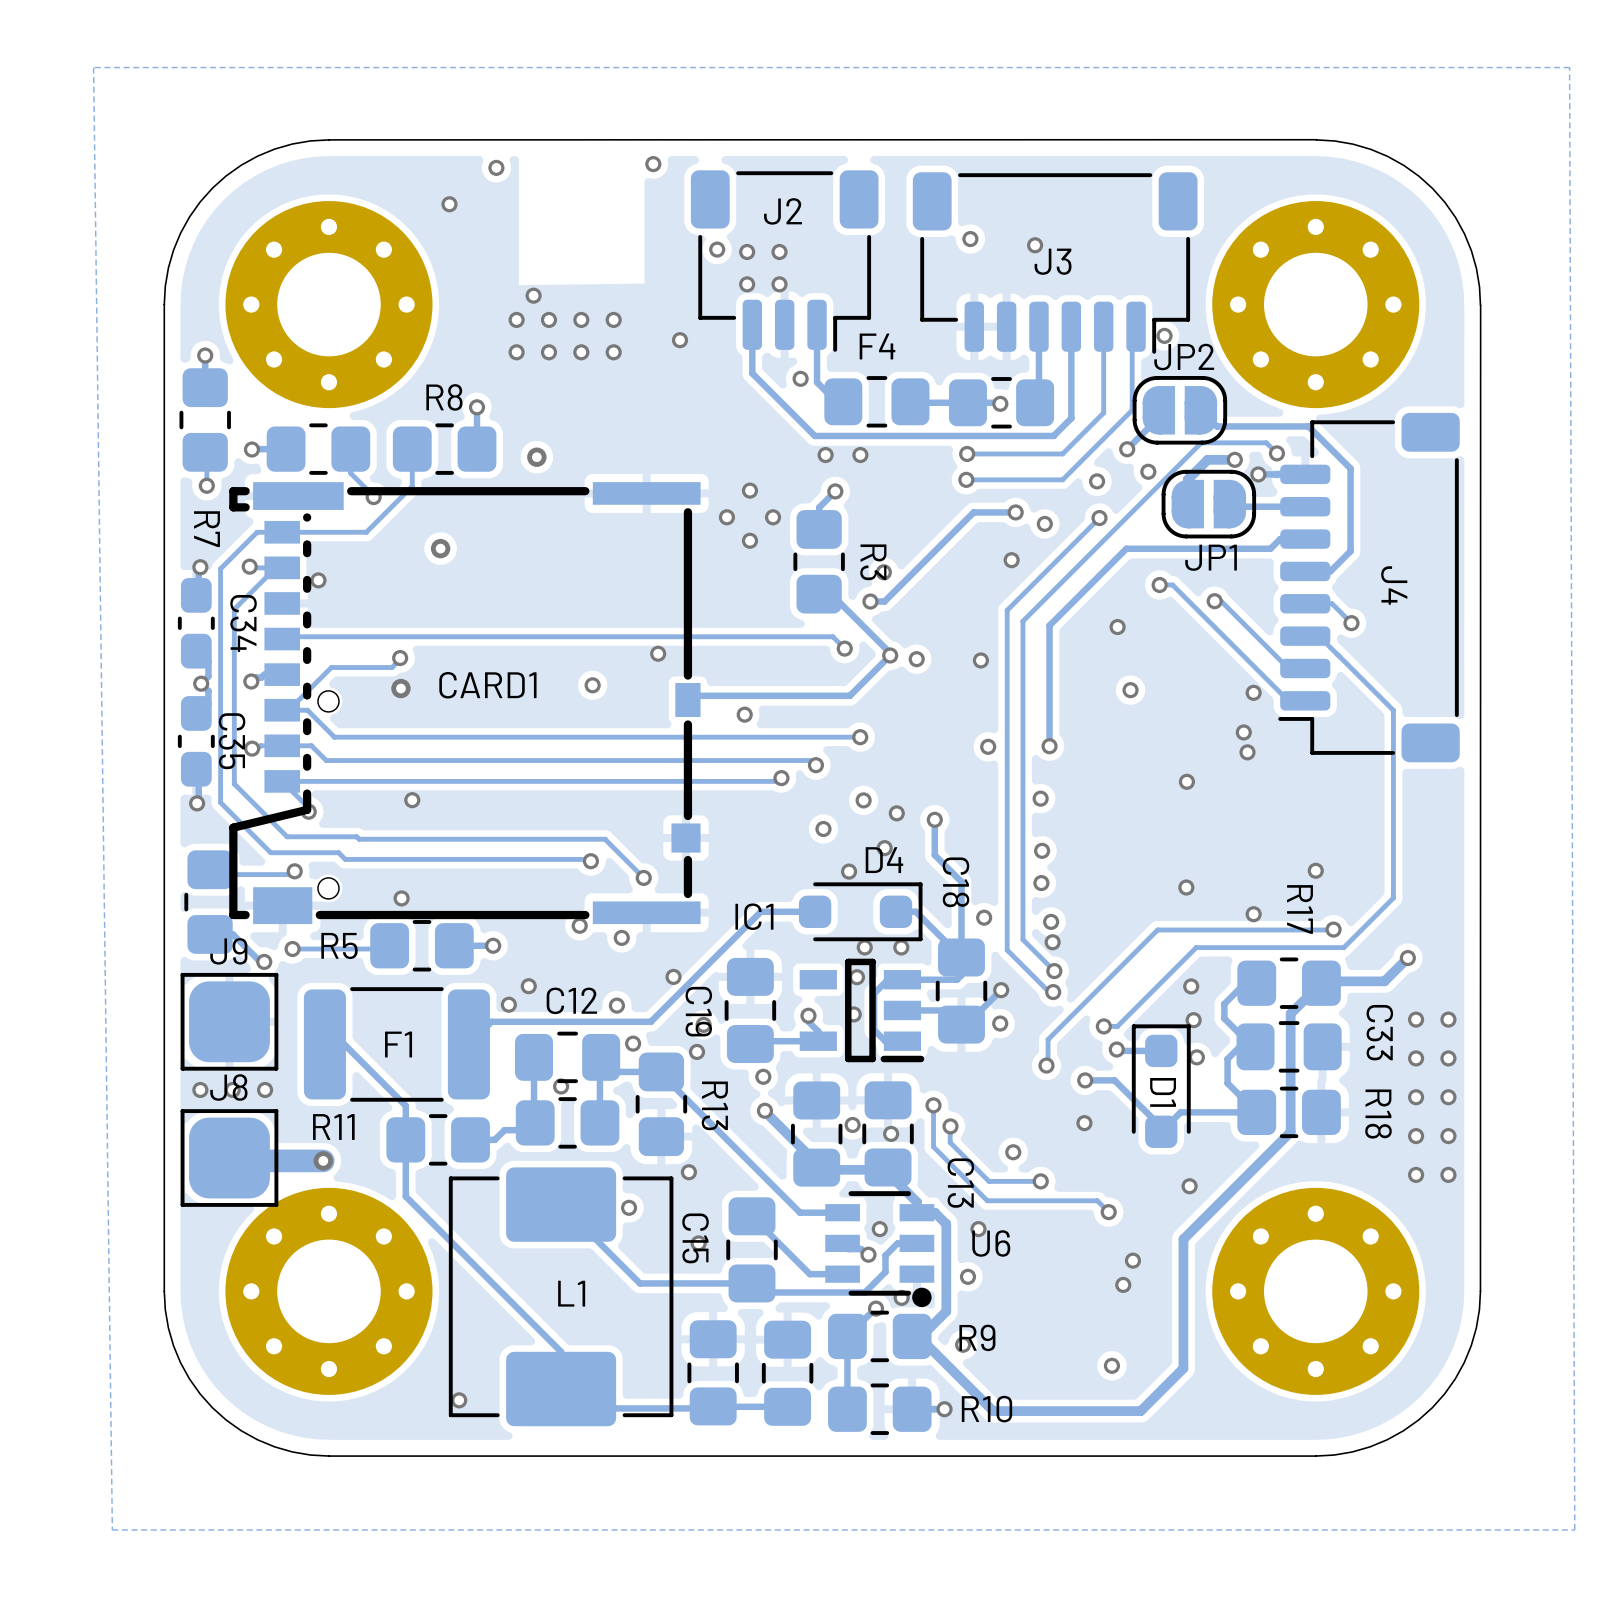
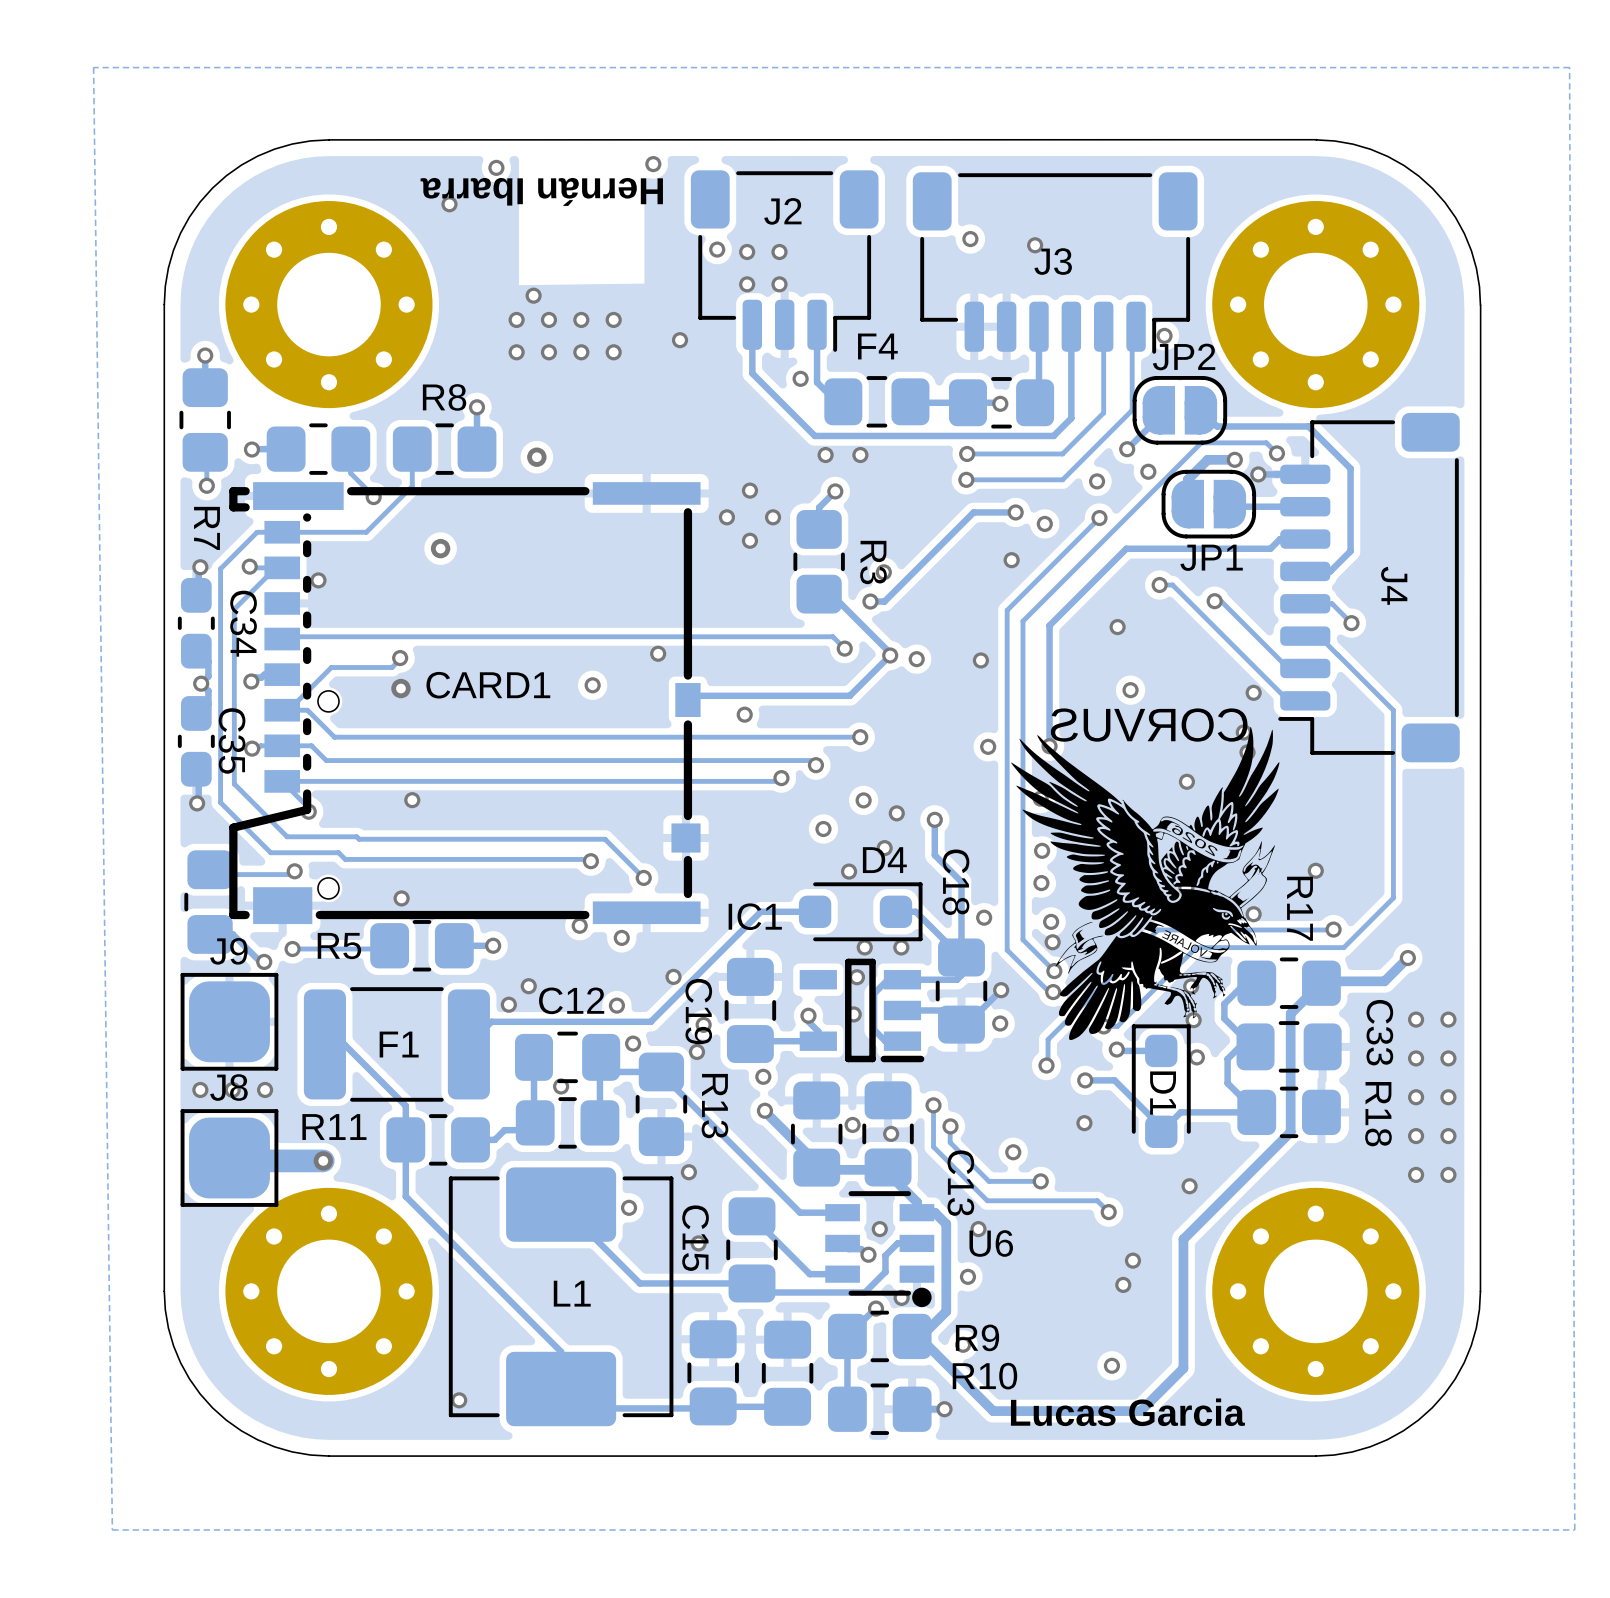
text: none -> Hernán Ibarra (541, 191)
drawing: none -> [1011, 726, 1280, 1040]
R10 name position: R10 (987, 1409) -> R10 (984, 1376)
text: none -> Lucas Garcia (1127, 1412)

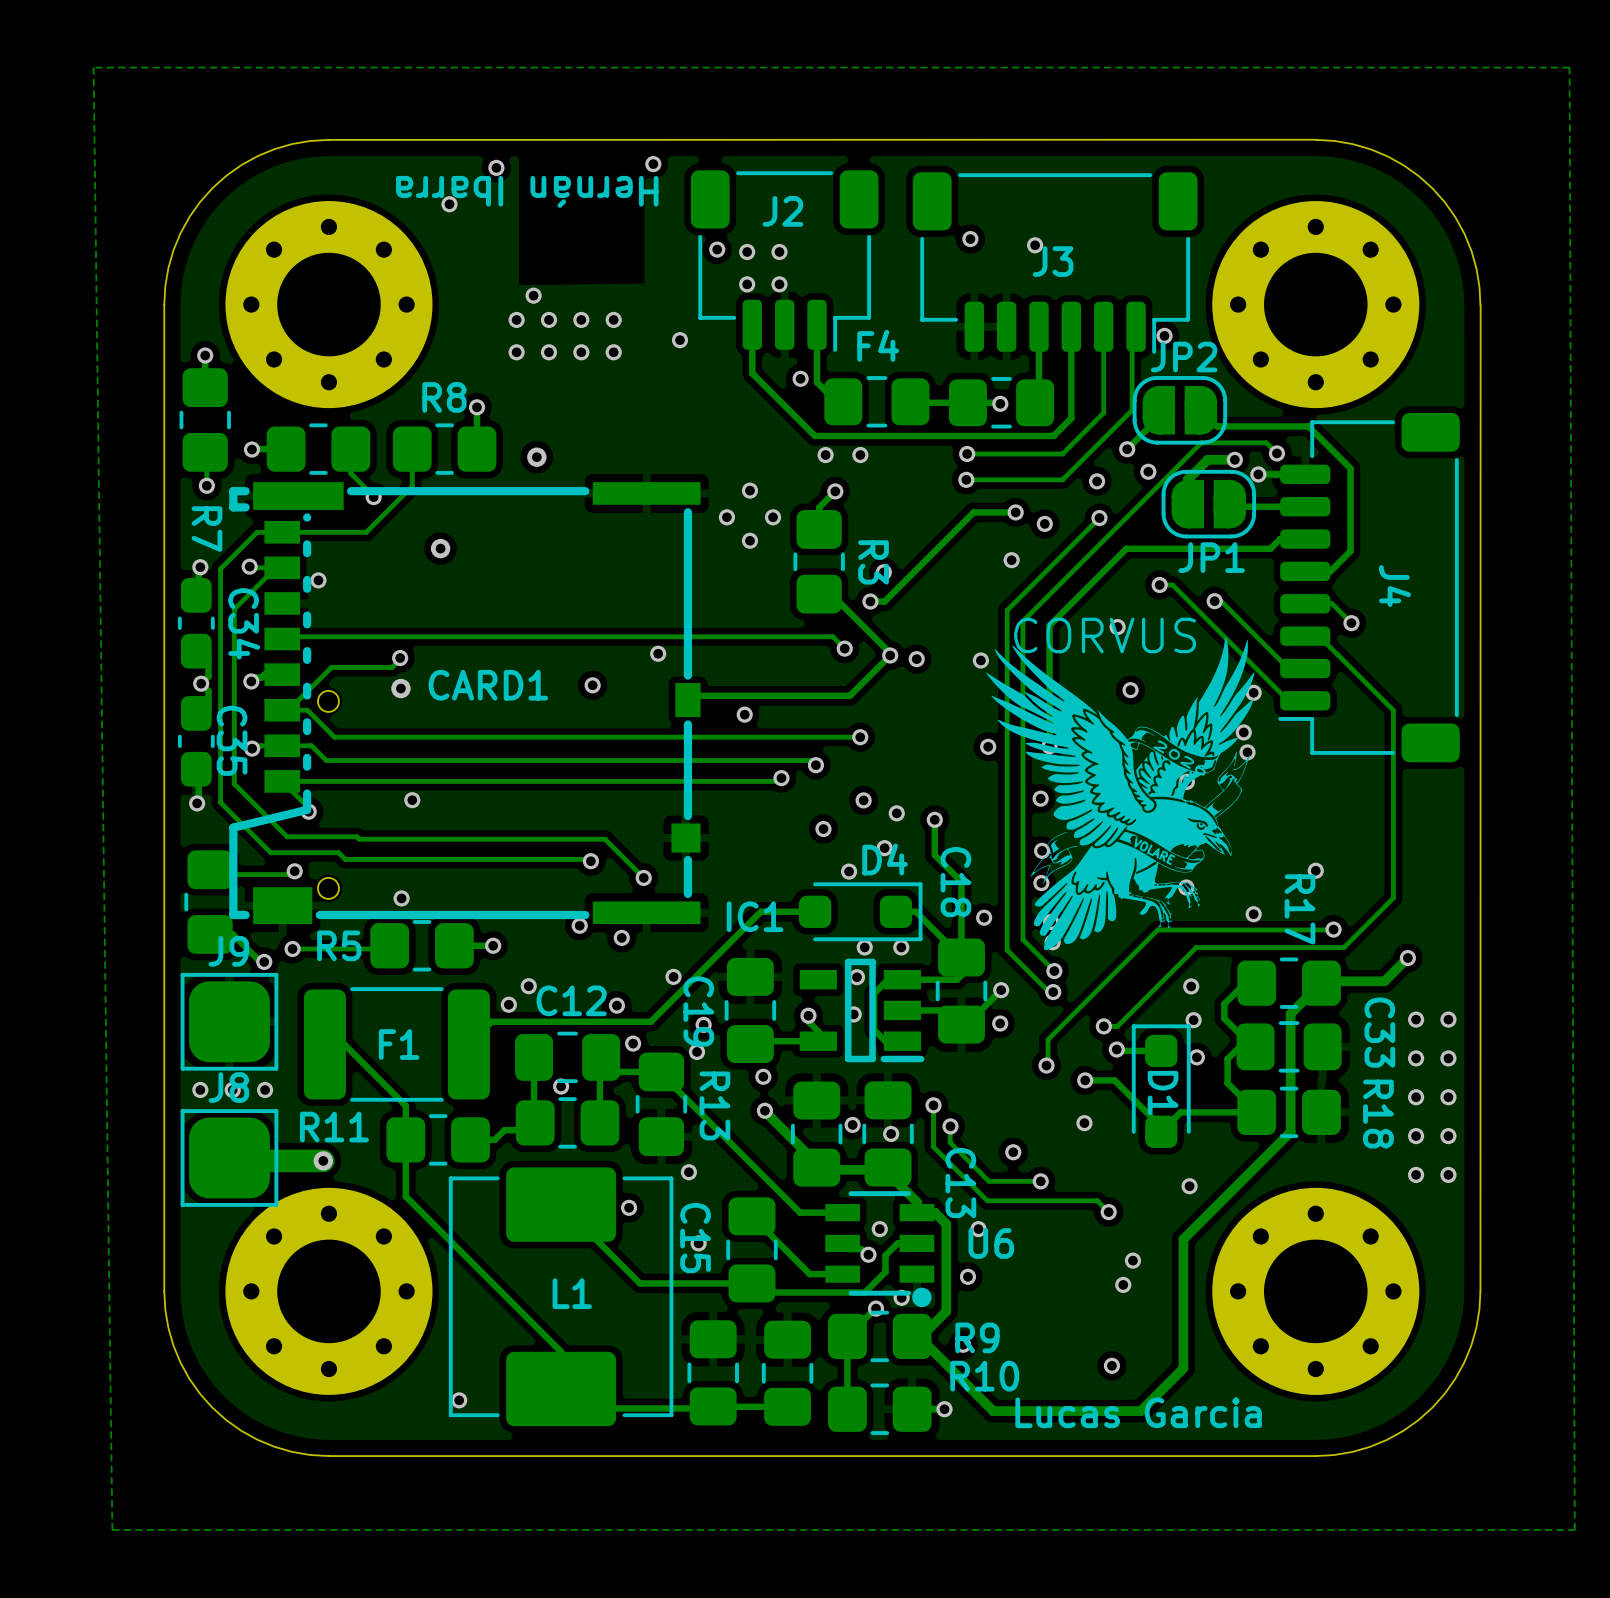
drawing: none -> [986, 636, 1255, 951]
drawing: [1011, 726, 1280, 1040] -> none

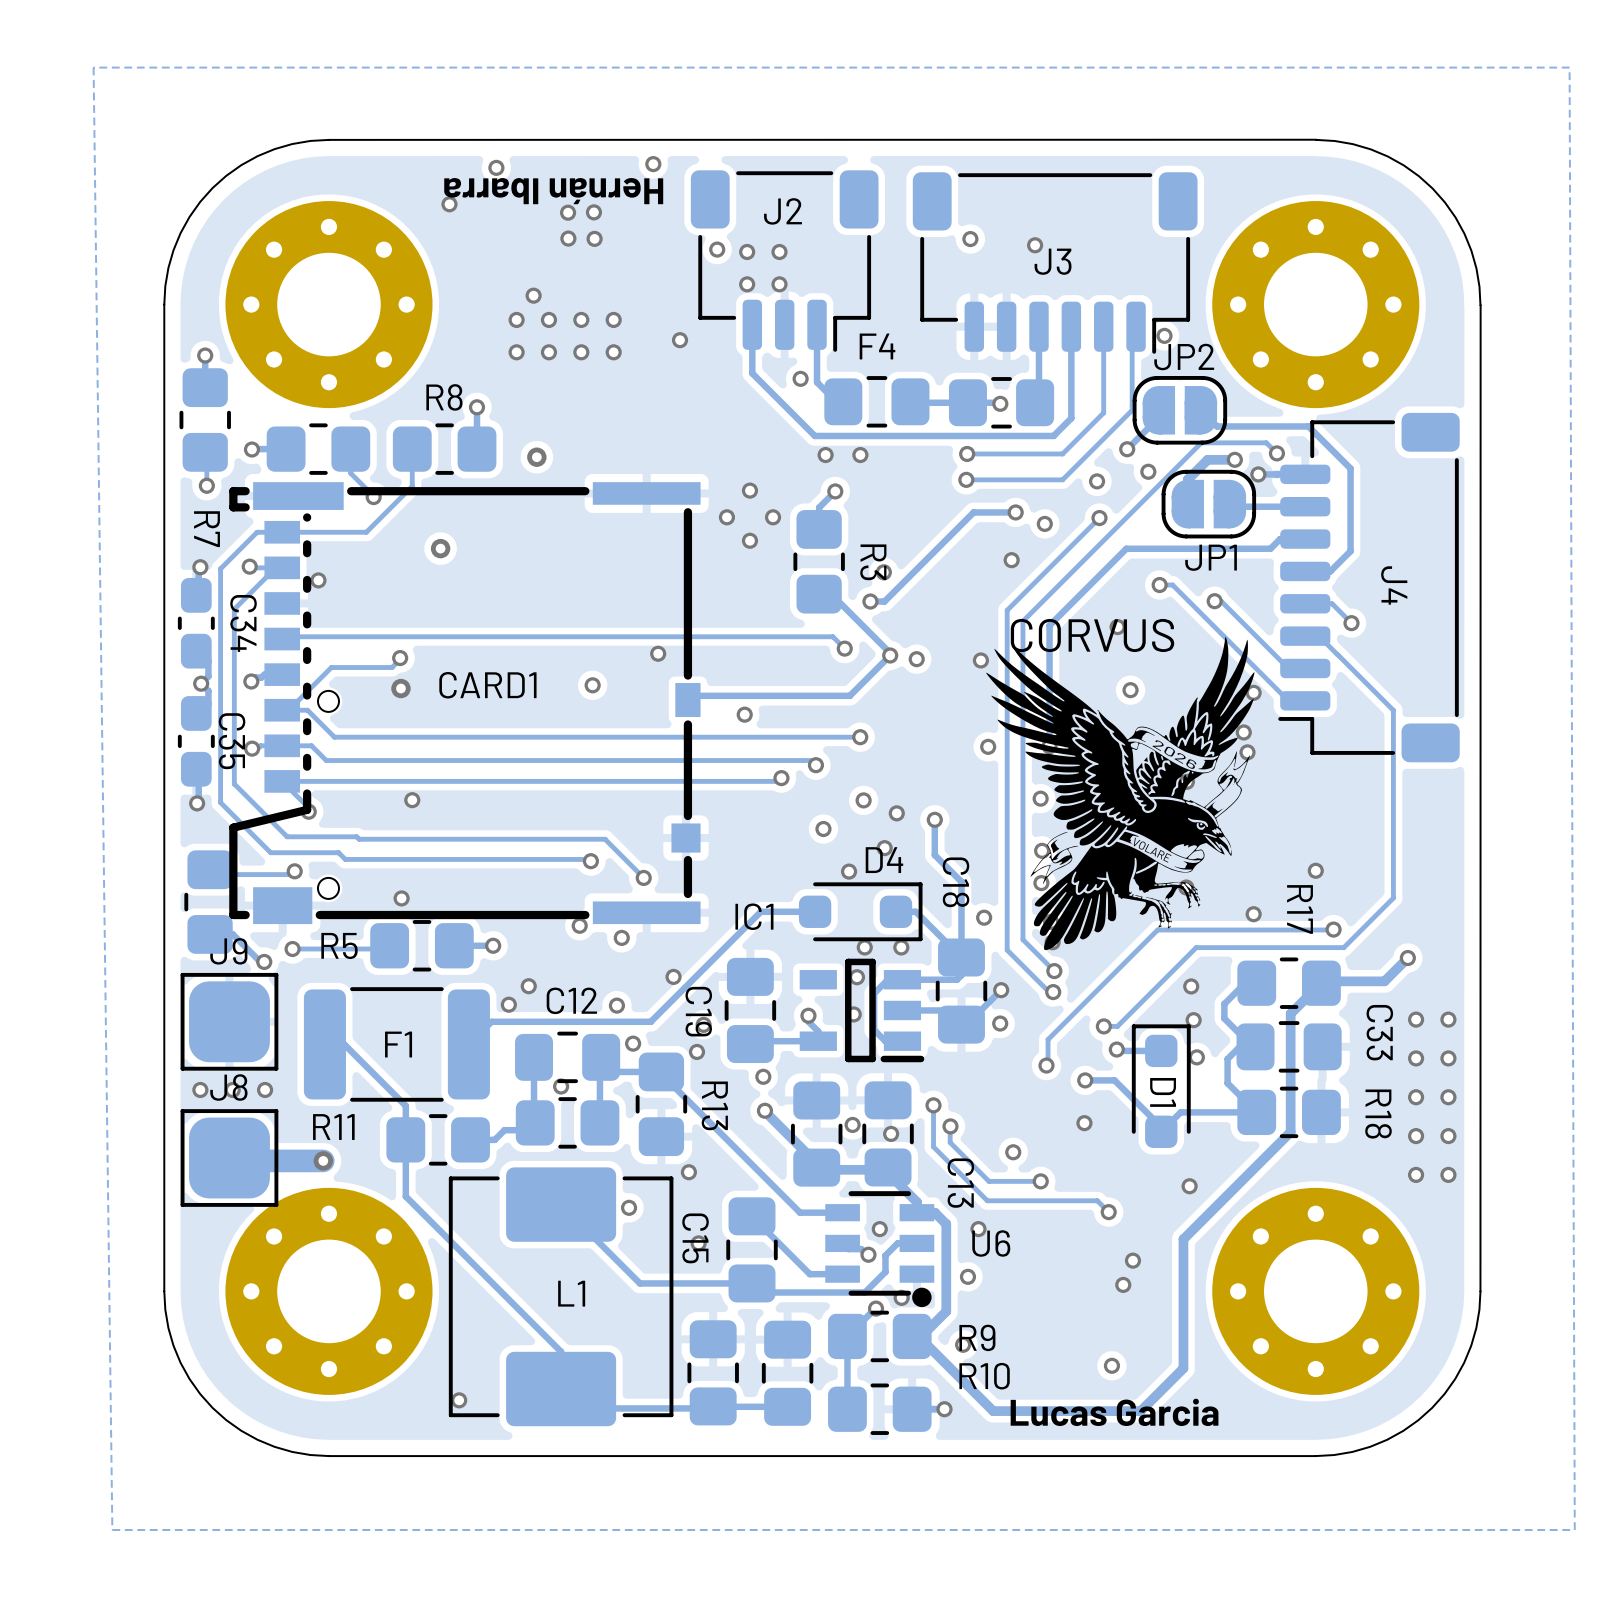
via: none -> (568, 212)
via: none -> (593, 212)
via: none -> (568, 238)
via: none -> (594, 238)

